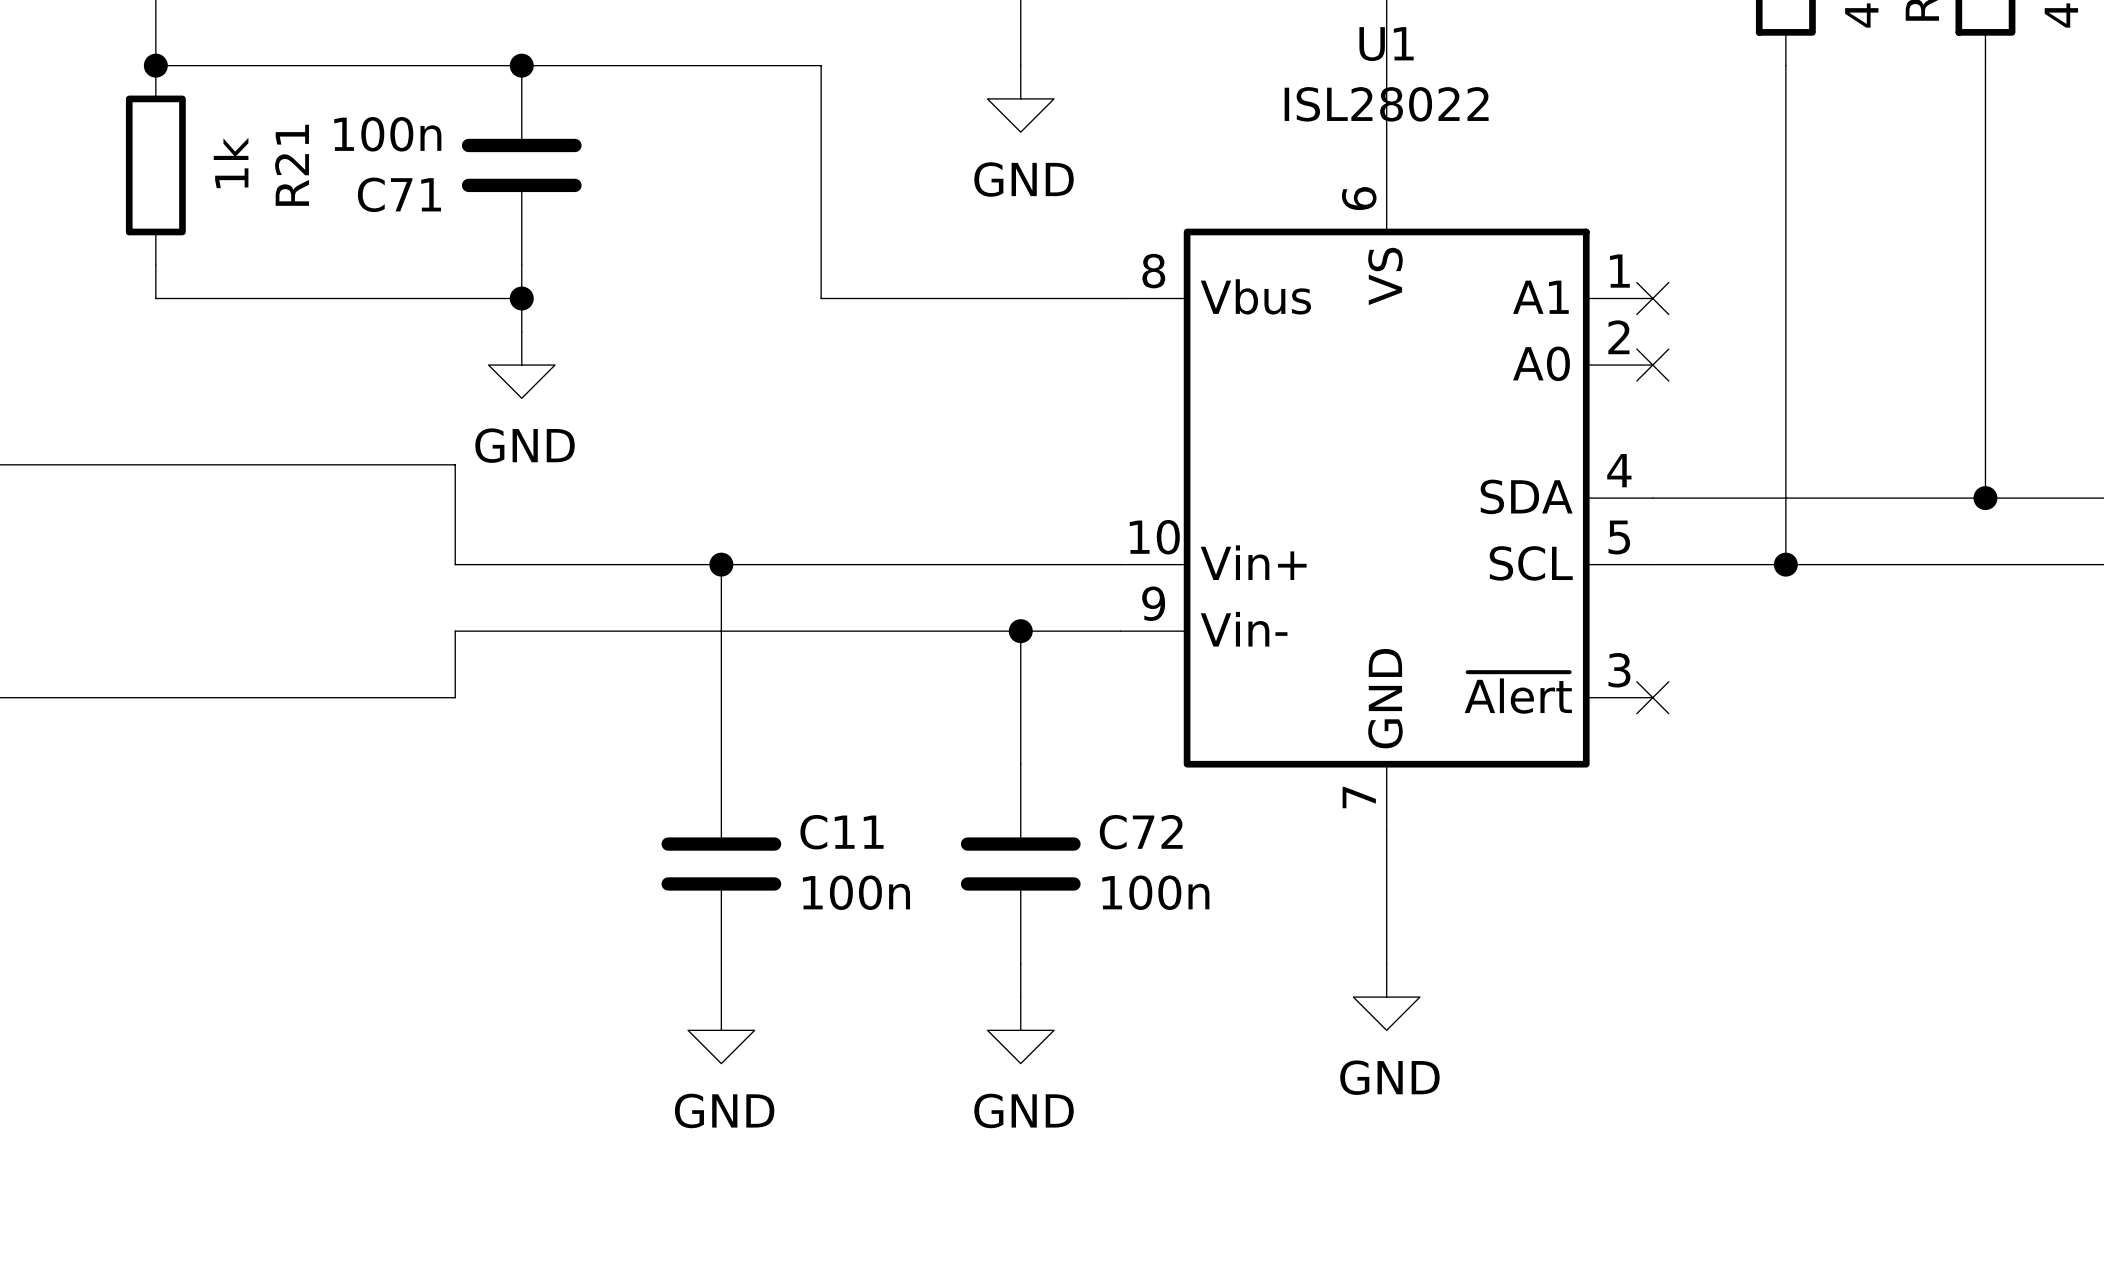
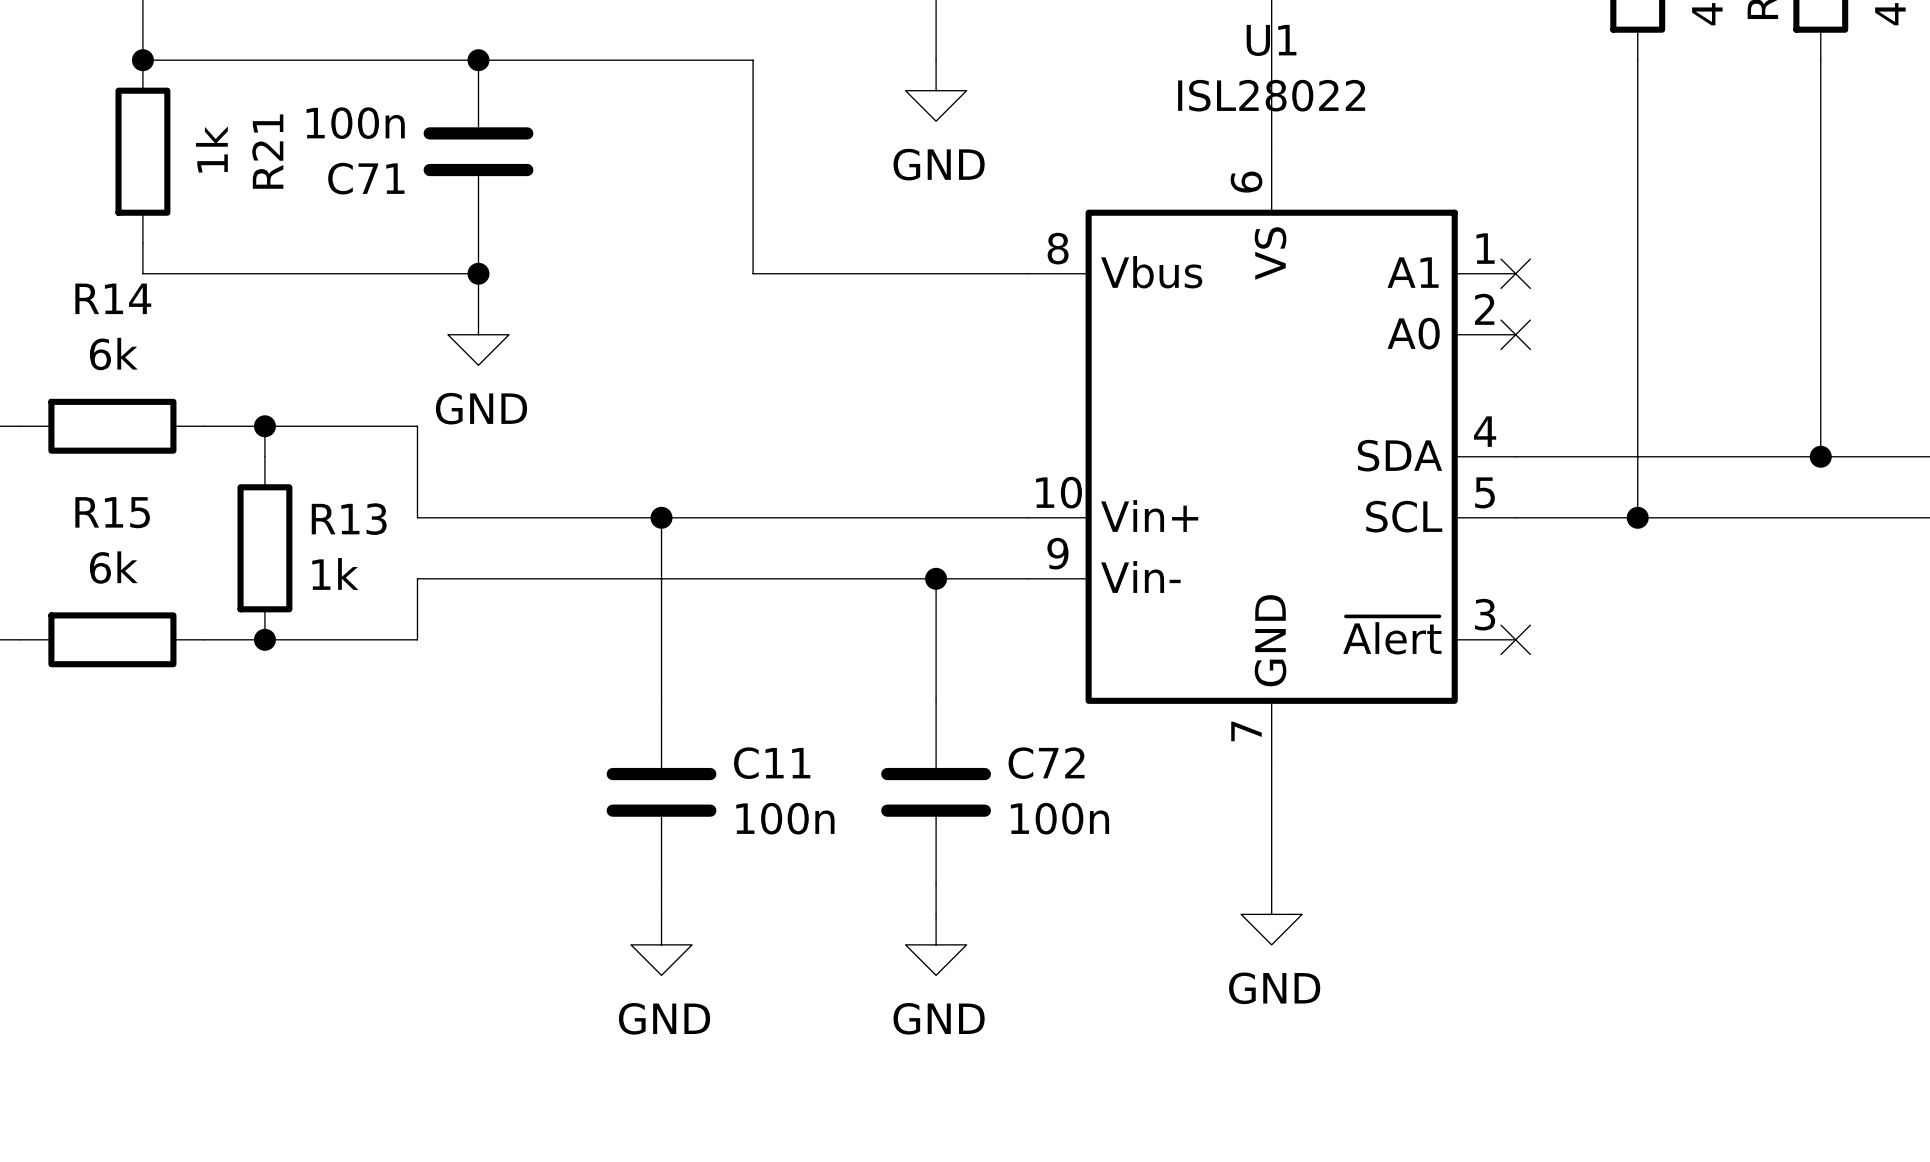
wire: (22, 464) (222, 464) -> none
R14: none -> 6k (112, 426)
wire: none -> (264, 426) (264, 456)
junction: none -> (264, 426)
R13: none -> 1k (264, 548)
wire: (22, 697) (222, 697) -> none
R15: none -> 6k (112, 639)
junction: none -> (264, 639)

